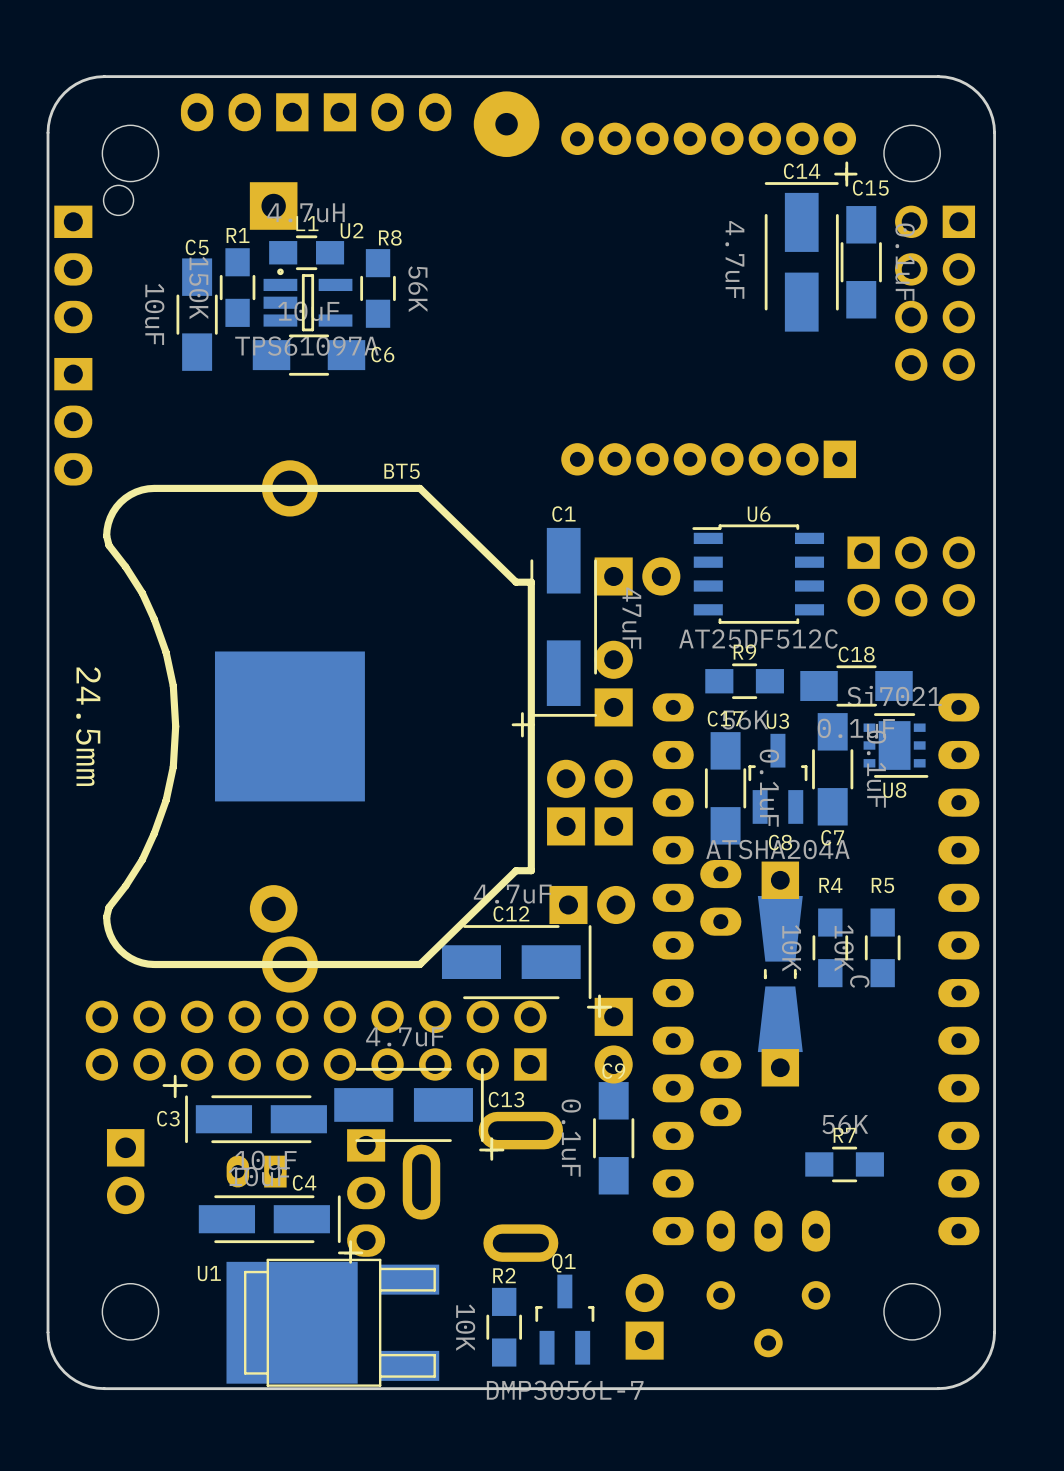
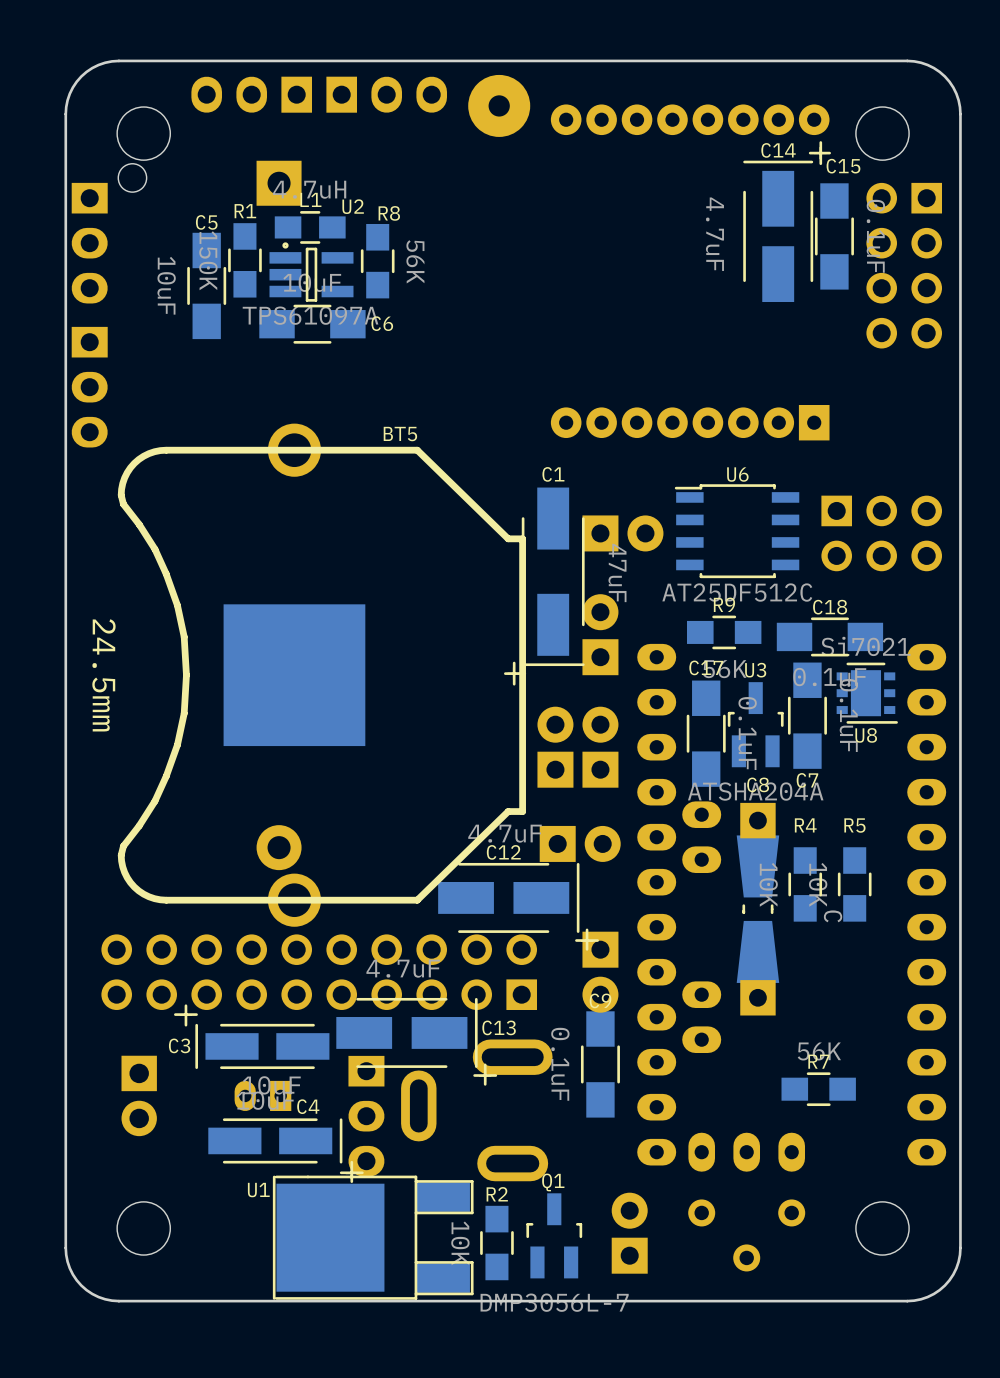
U1 footprint: [226, 1258, 440, 1387] -> [272, 1175, 474, 1300]

